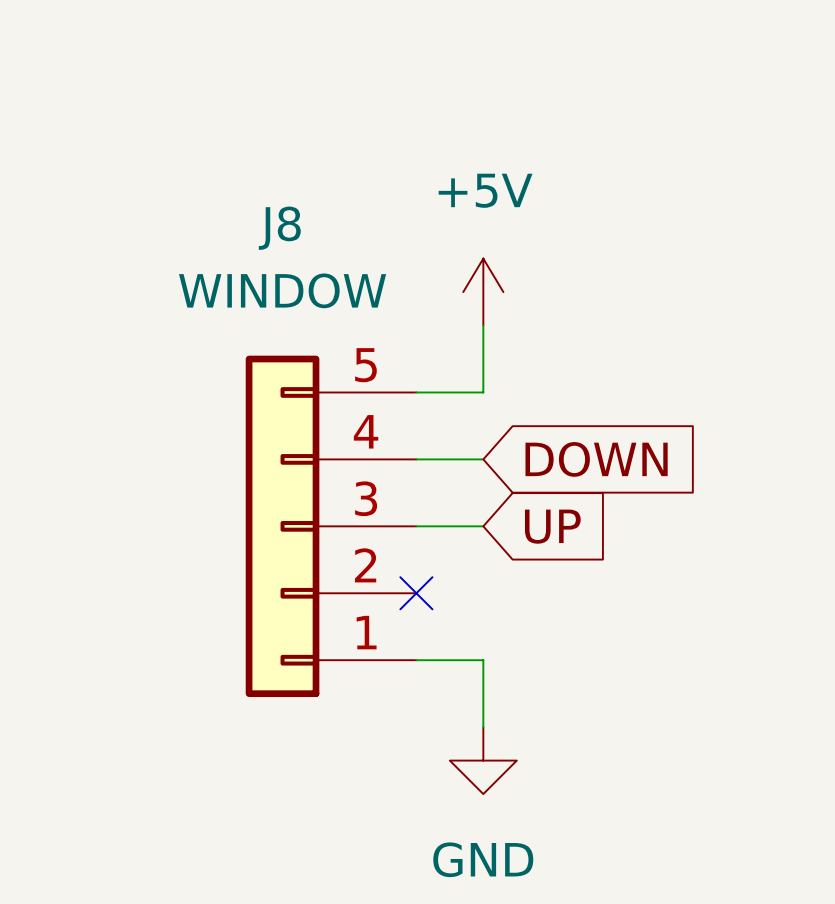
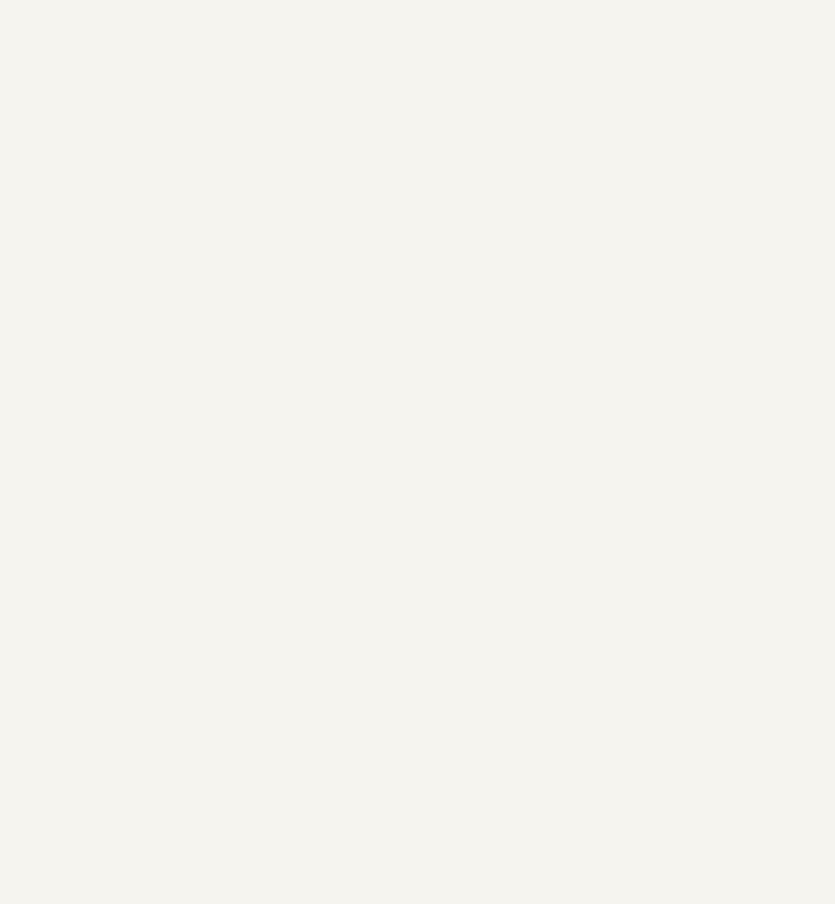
power symbol: +5V (483, 292) -> none
wire: (483, 325) (483, 392) (416, 392) -> none
wire: (416, 459) (483, 459) -> none
global label: DOWN (596, 459) -> none
J8: WINDOW (331, 526) -> none
wire: (416, 526) (483, 526) -> none
global label: UP (552, 526) -> none
no-connect mark: (416, 593) -> none
wire: (416, 660) (483, 660) (483, 727) -> none
power symbol: GND (483, 760) -> none

